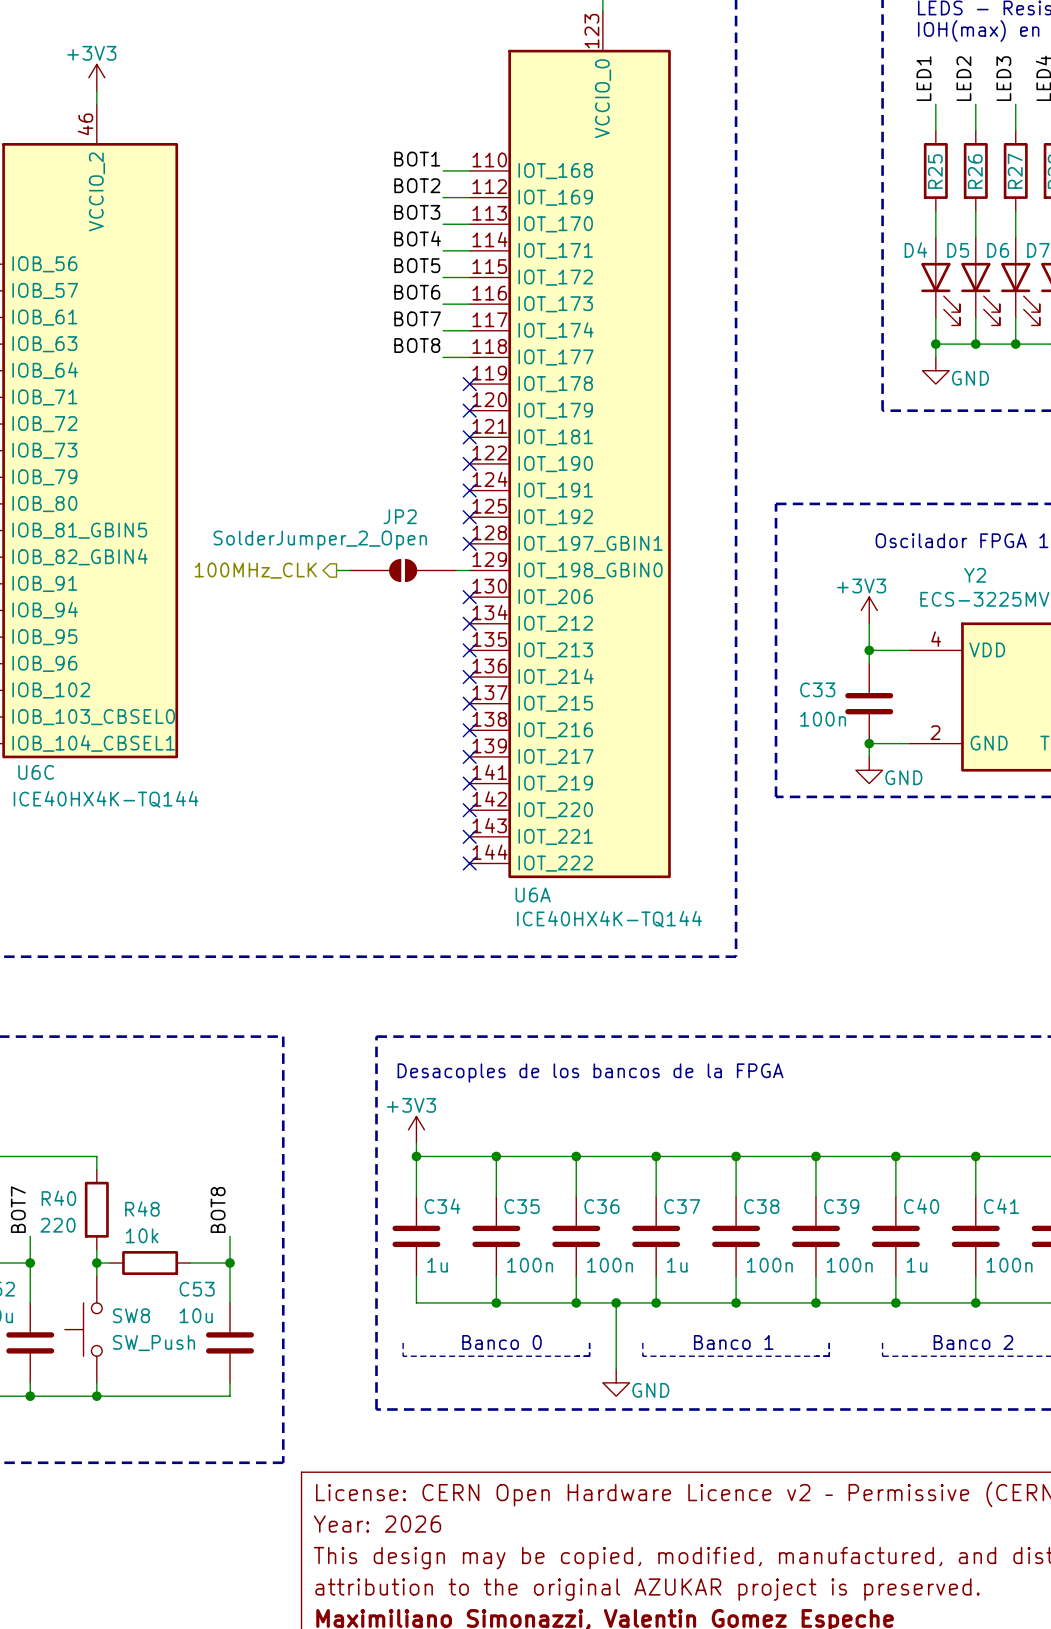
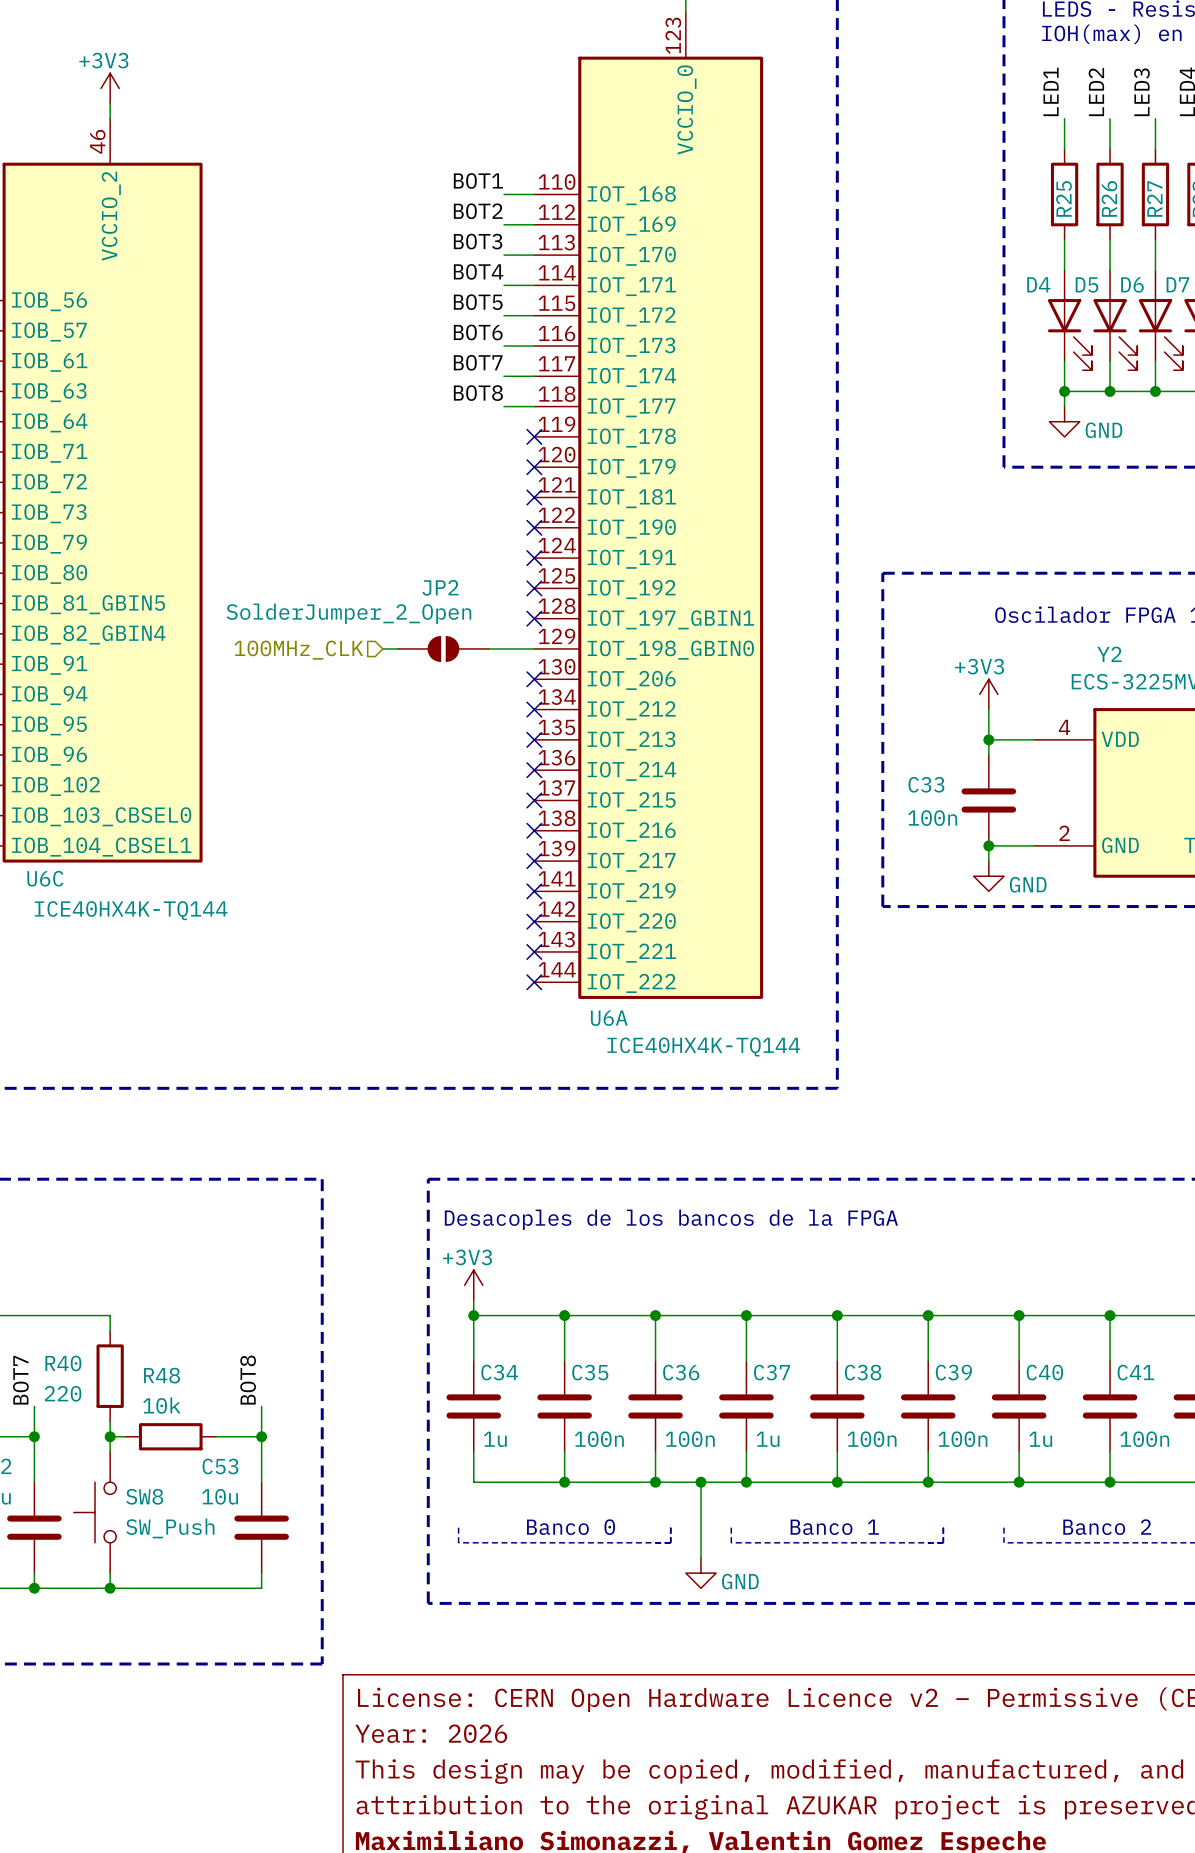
JP2 symbol: [349, 559, 457, 582] -> [397, 636, 489, 662]
hierarchical label shape: output (255, 570) -> input (298, 650)

